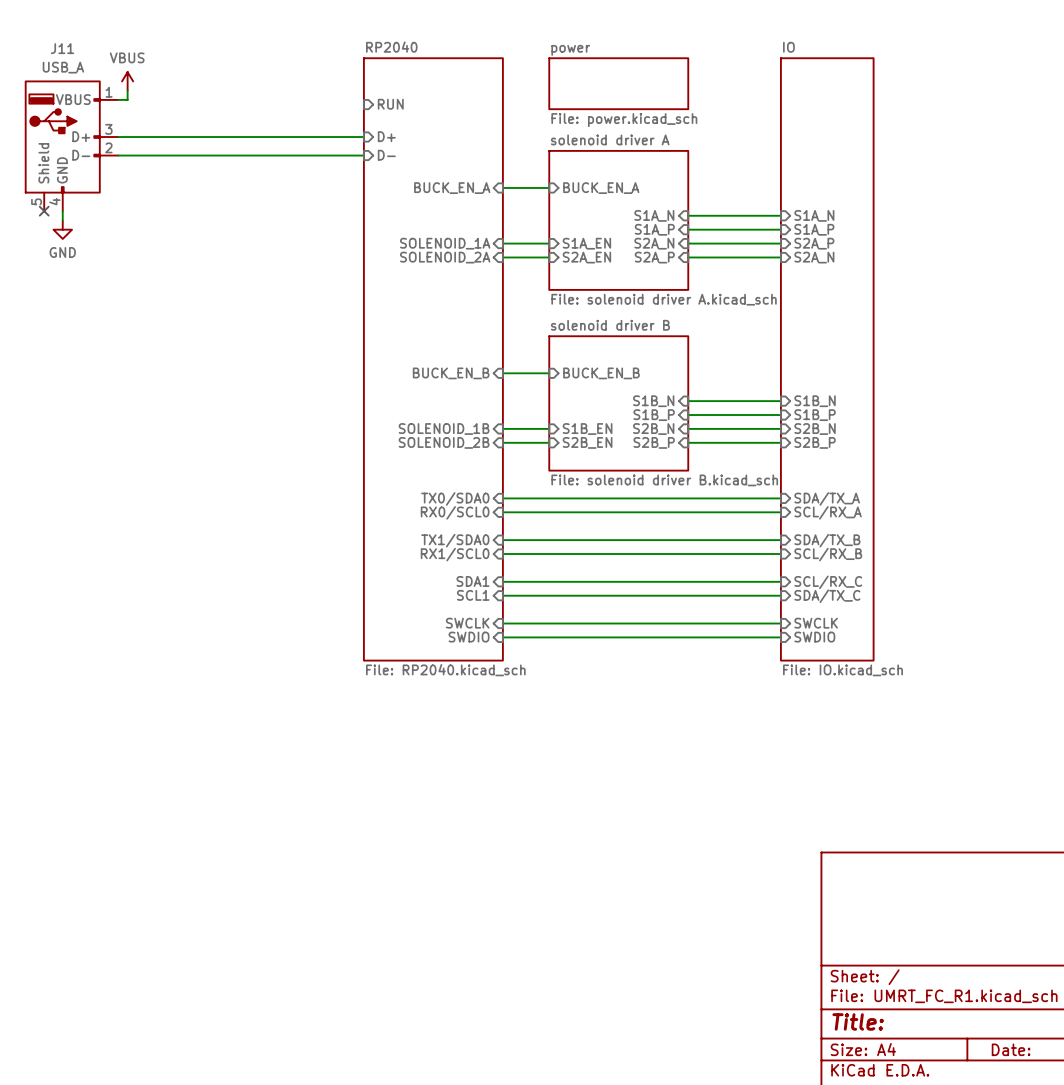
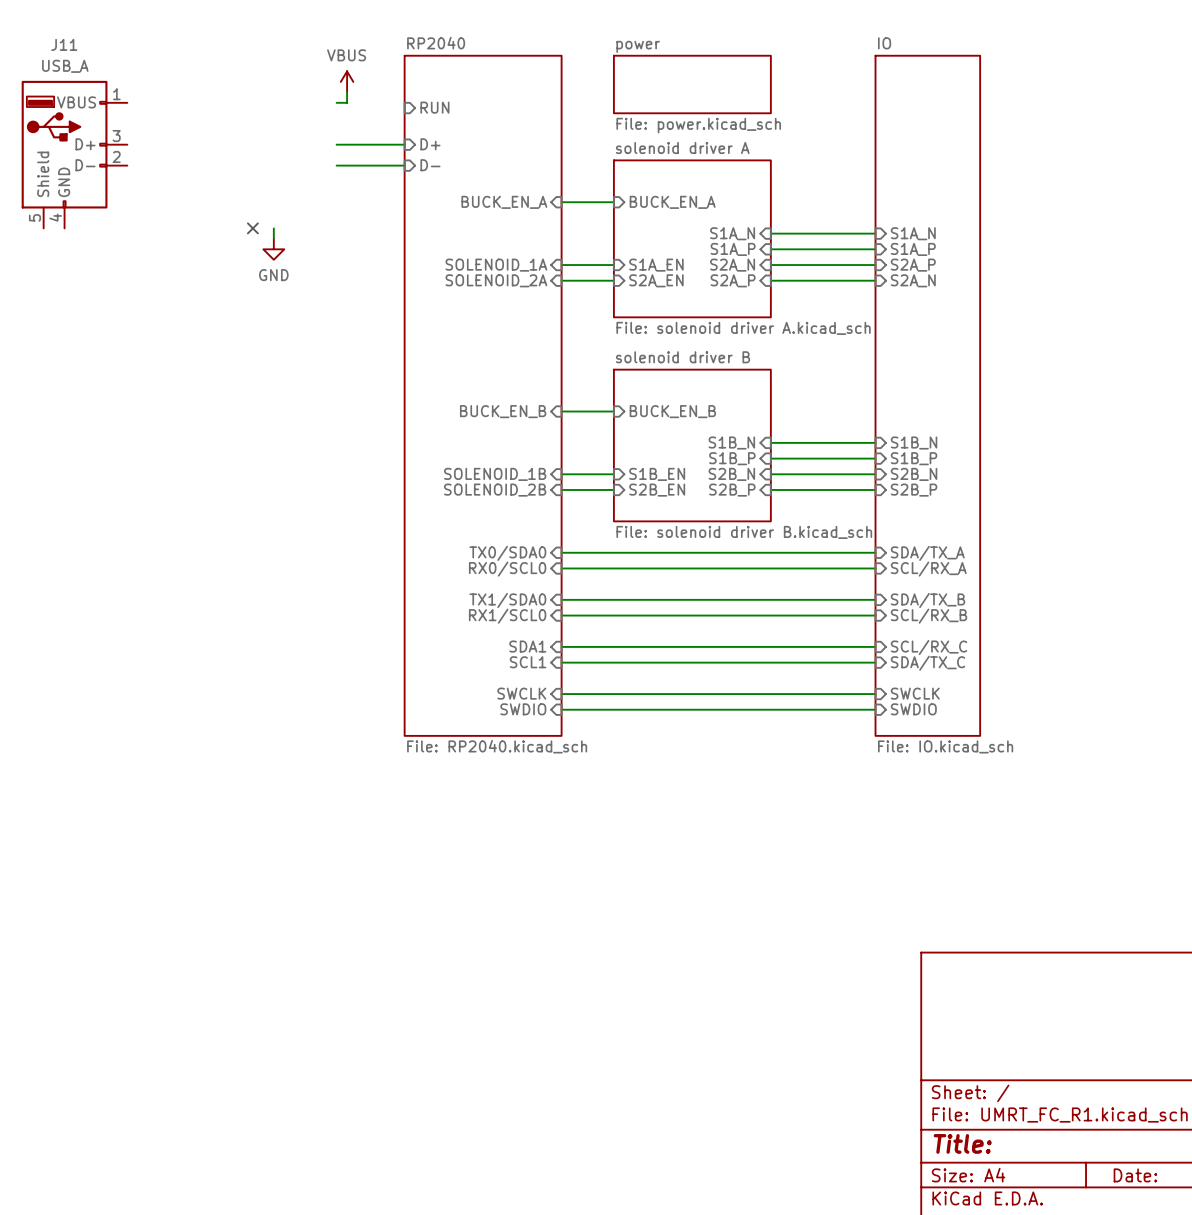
power symbol: VBUS (127, 81) -> none
power symbol: none -> VBUS (347, 81)
wire: (127, 90) (127, 99) (118, 99) -> none
wire: none -> (347, 92) (347, 102) (336, 102)
wire: (118, 137) (303, 137) -> none
wire: (118, 155) (303, 155) -> none
no-connect mark: (44, 211) -> none
wire: (62, 211) (62, 220) -> none
no-connect mark: none -> (252, 228)
wire: none -> (273, 228) (273, 238)
power symbol: GND (62, 229) -> none
power symbol: none -> GND (273, 249)

